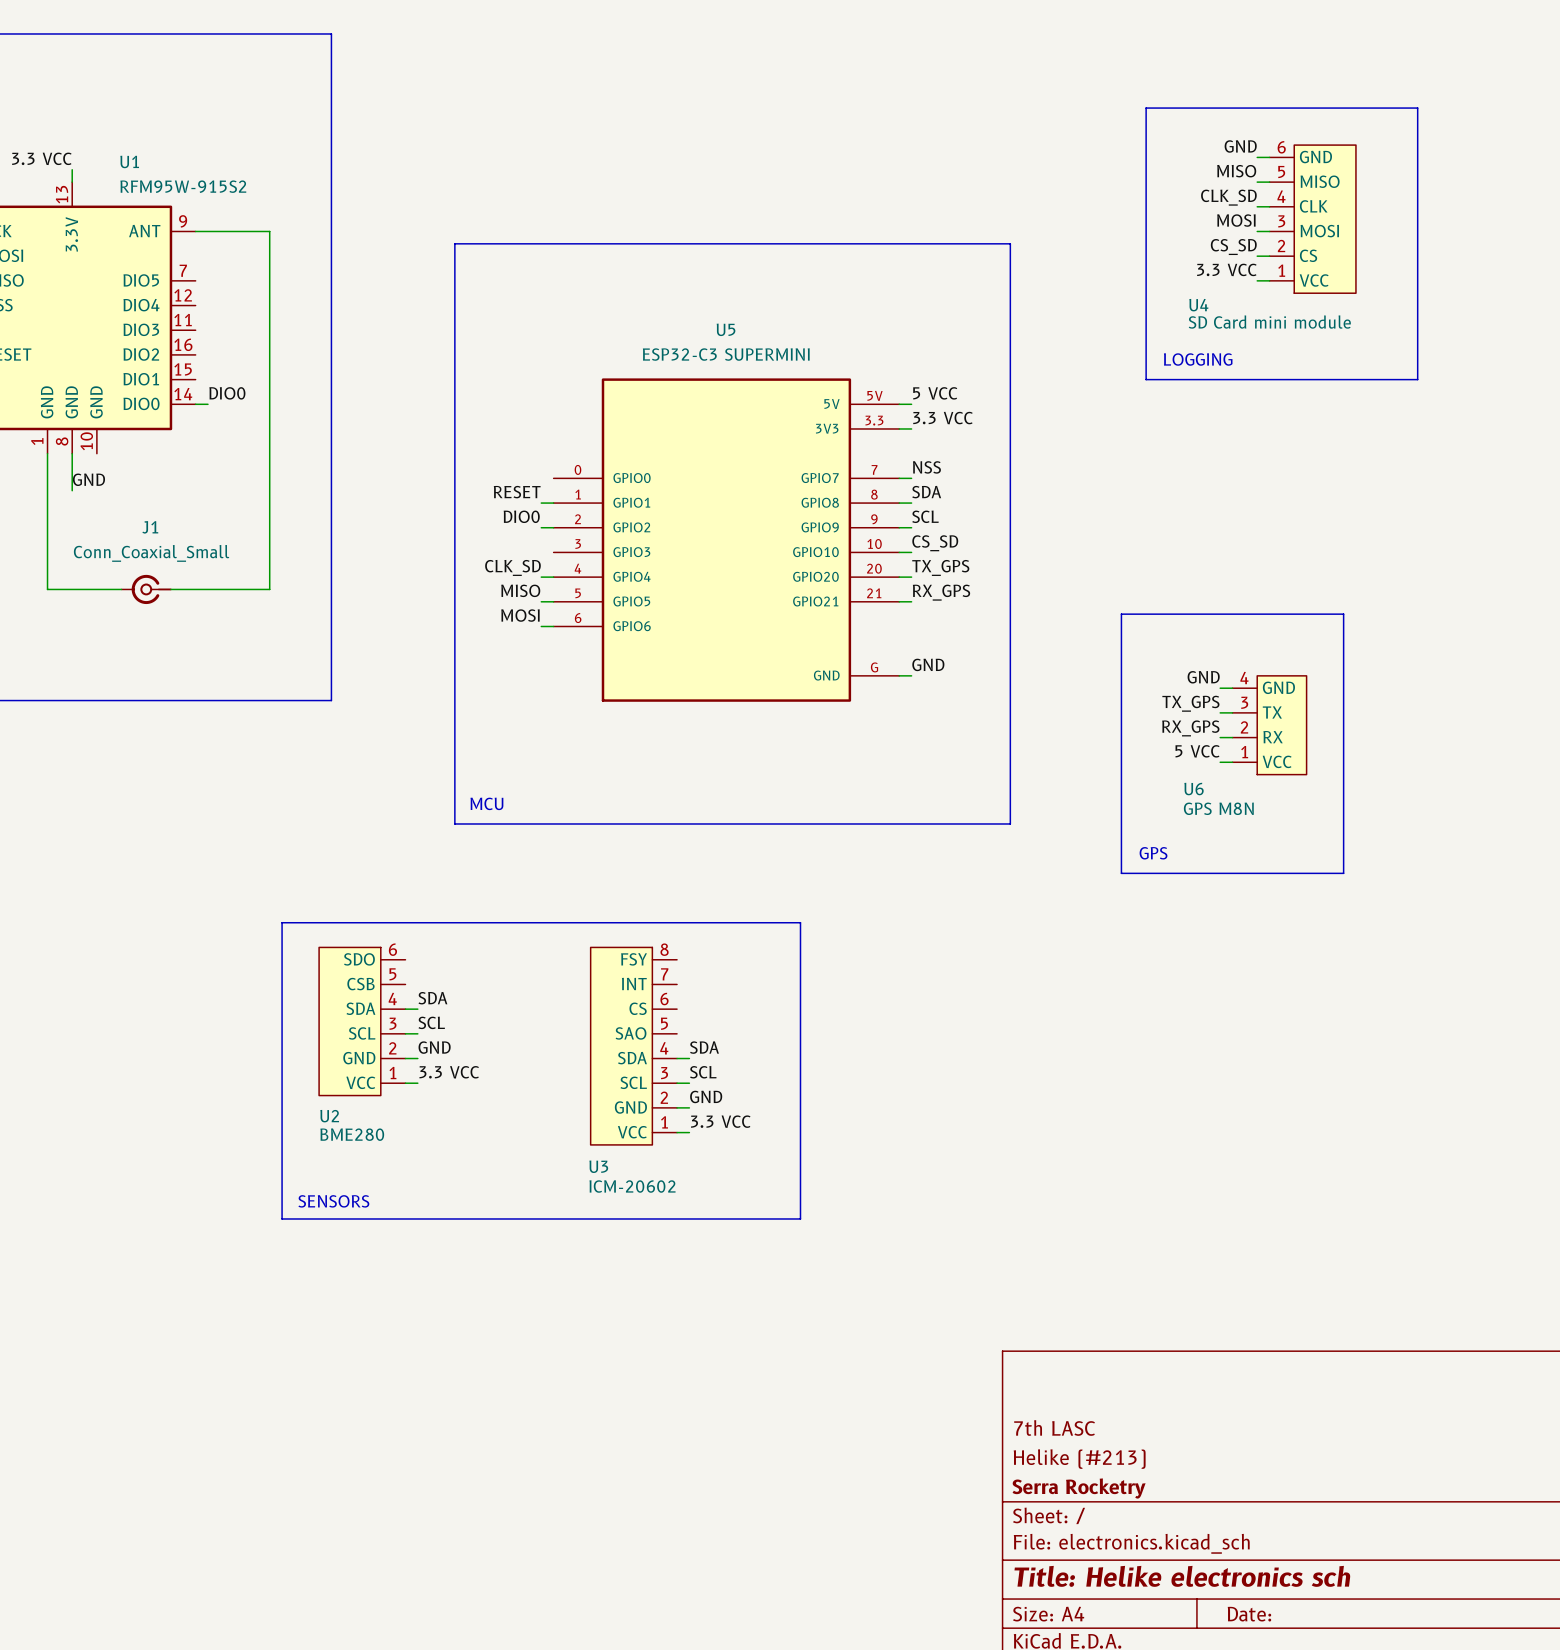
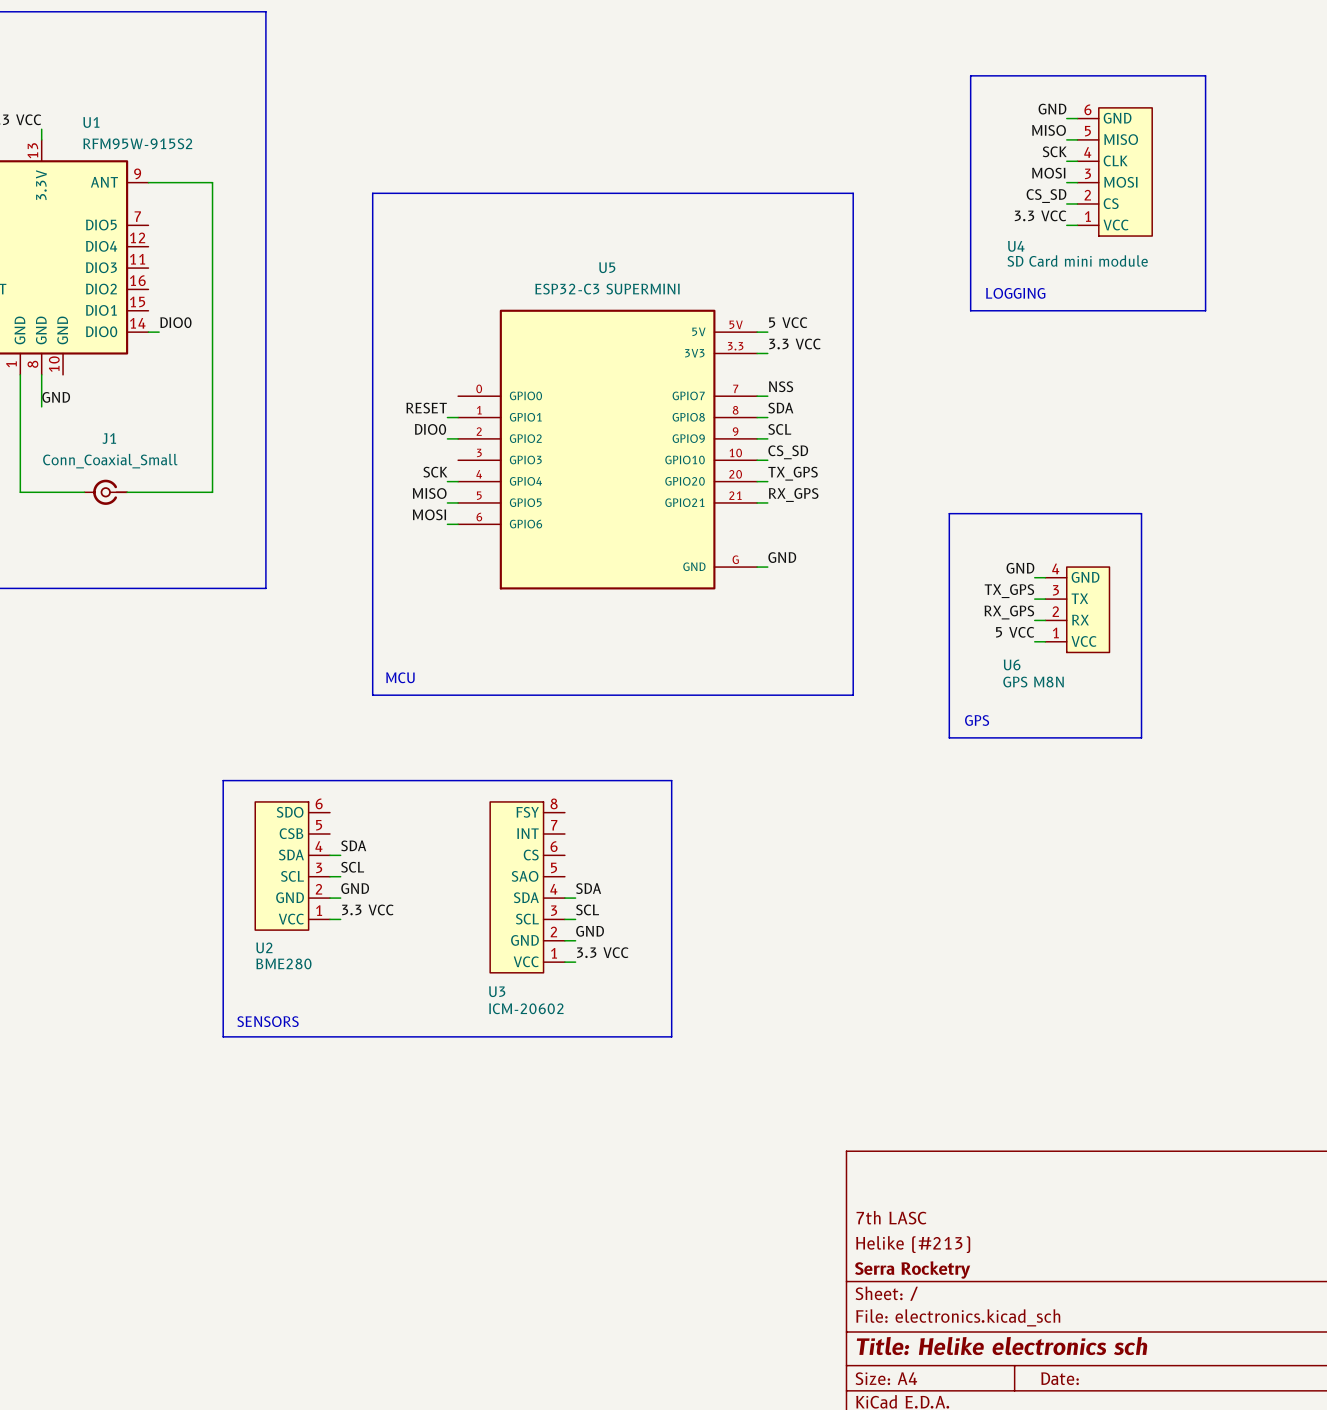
label: CLK_SD (1228, 197) -> SCK (1054, 151)
label: CLK_SD (512, 567) -> SCK (435, 472)

